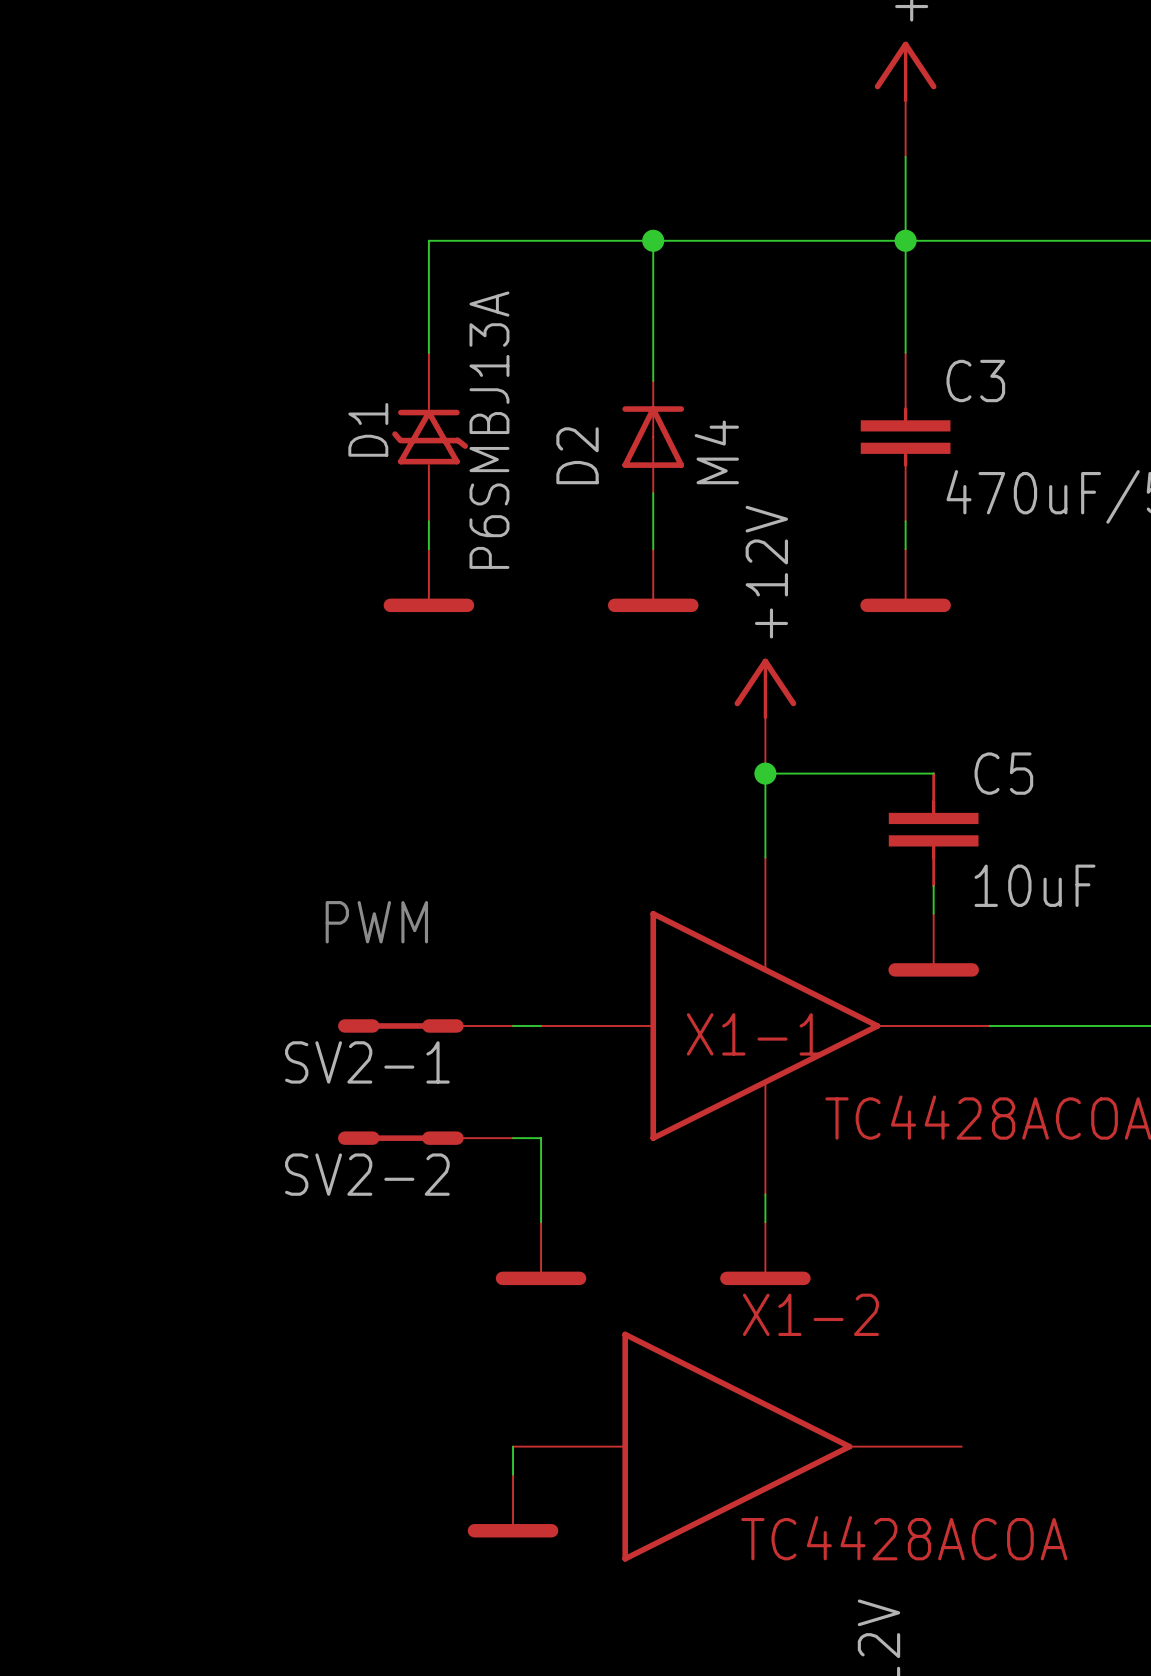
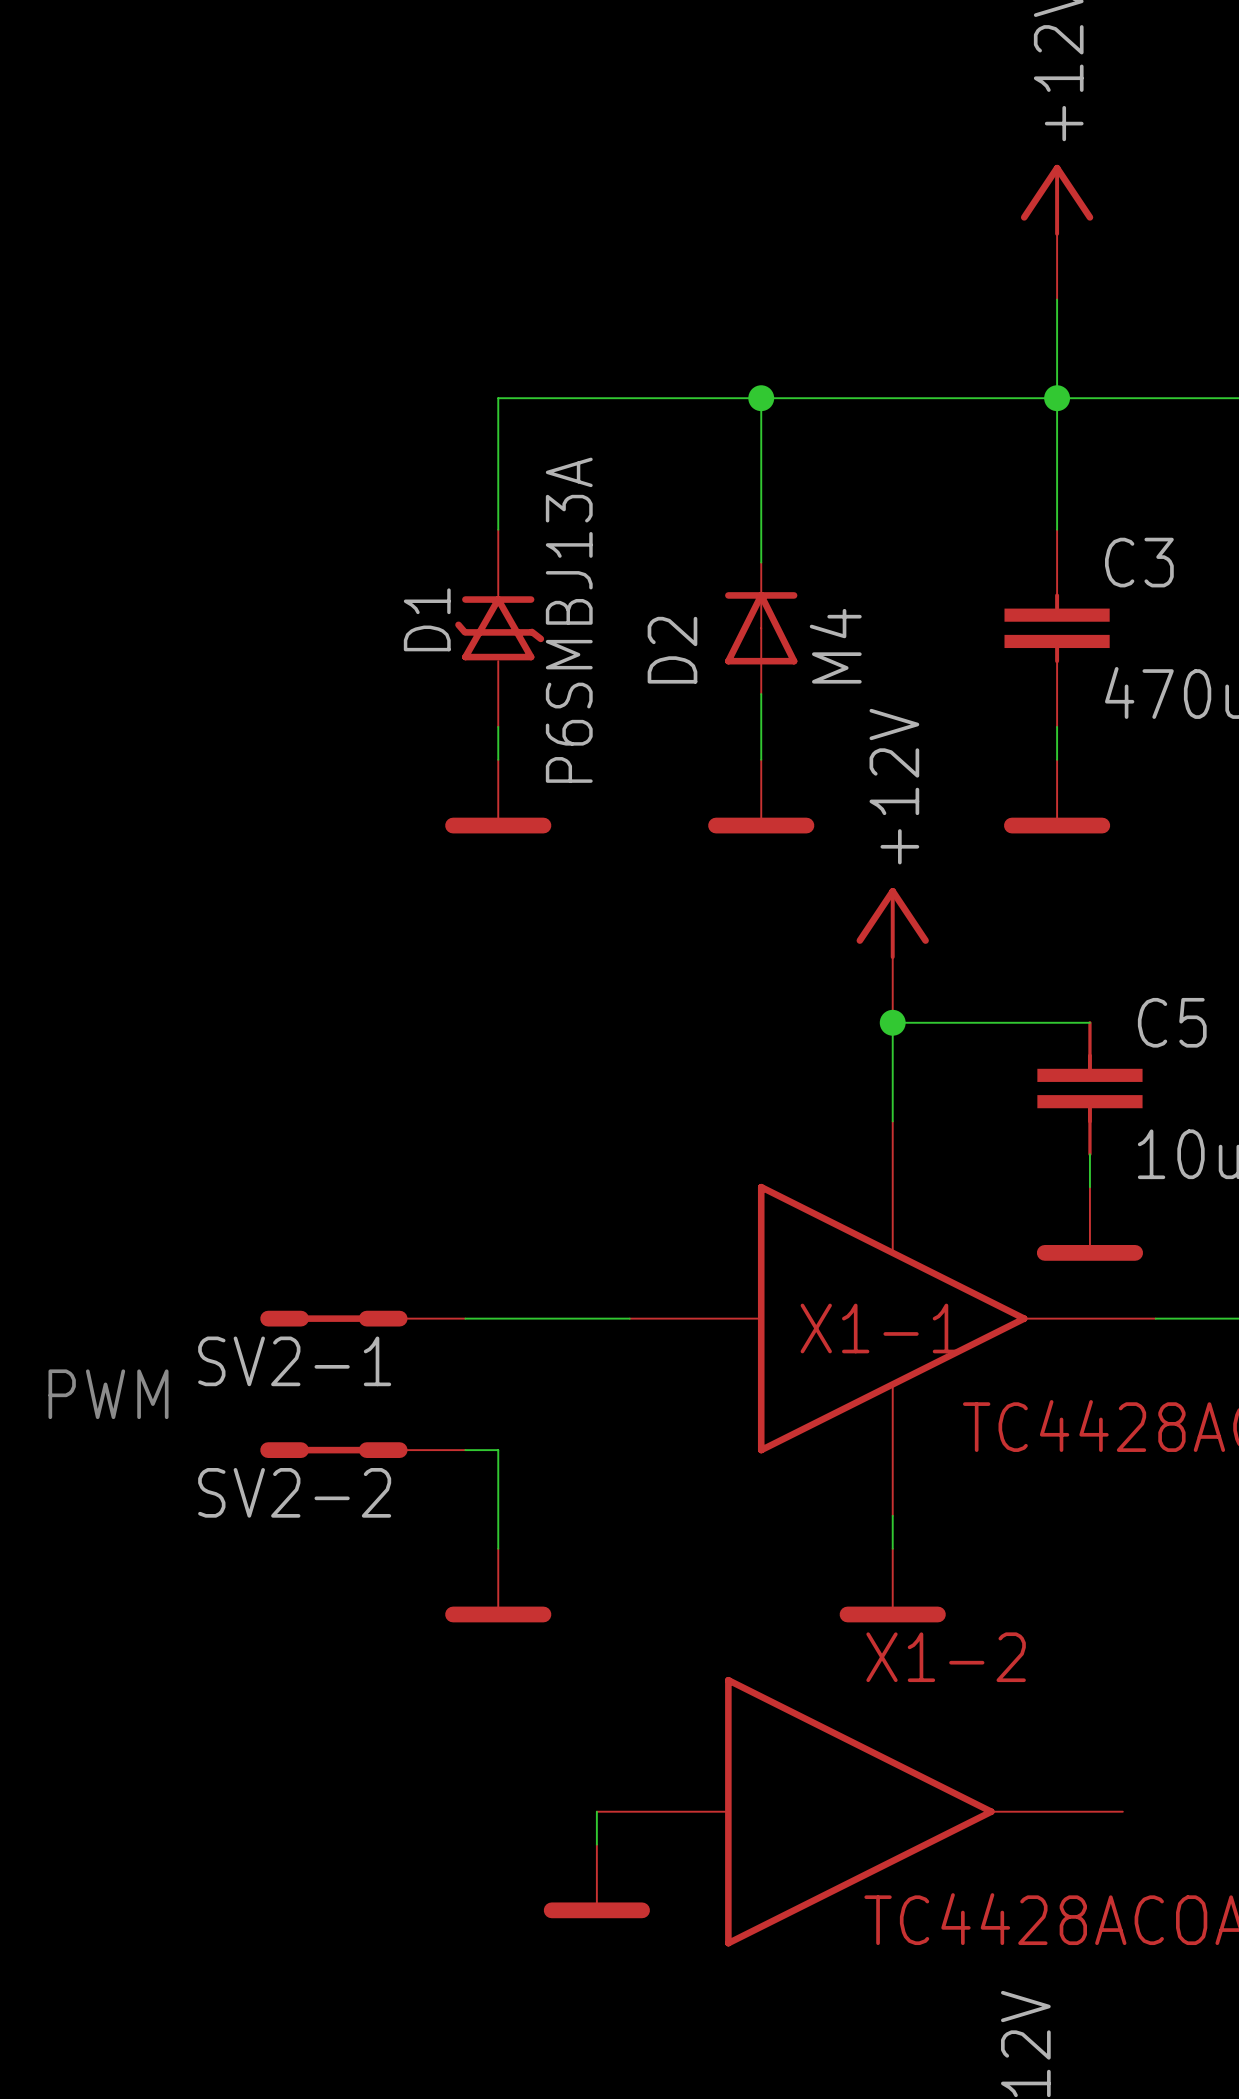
text position: PWM (376, 922) -> PWM (108, 1394)
SV2-1 position: (425, 1025) -> (362, 1318)
SV2-2 position: (425, 1138) -> (362, 1450)
wire: (513, 1138) (541, 1138) (541, 1222) -> (465, 1450) (498, 1450) (498, 1548)
power symbol position: (541, 1253) -> (498, 1585)

